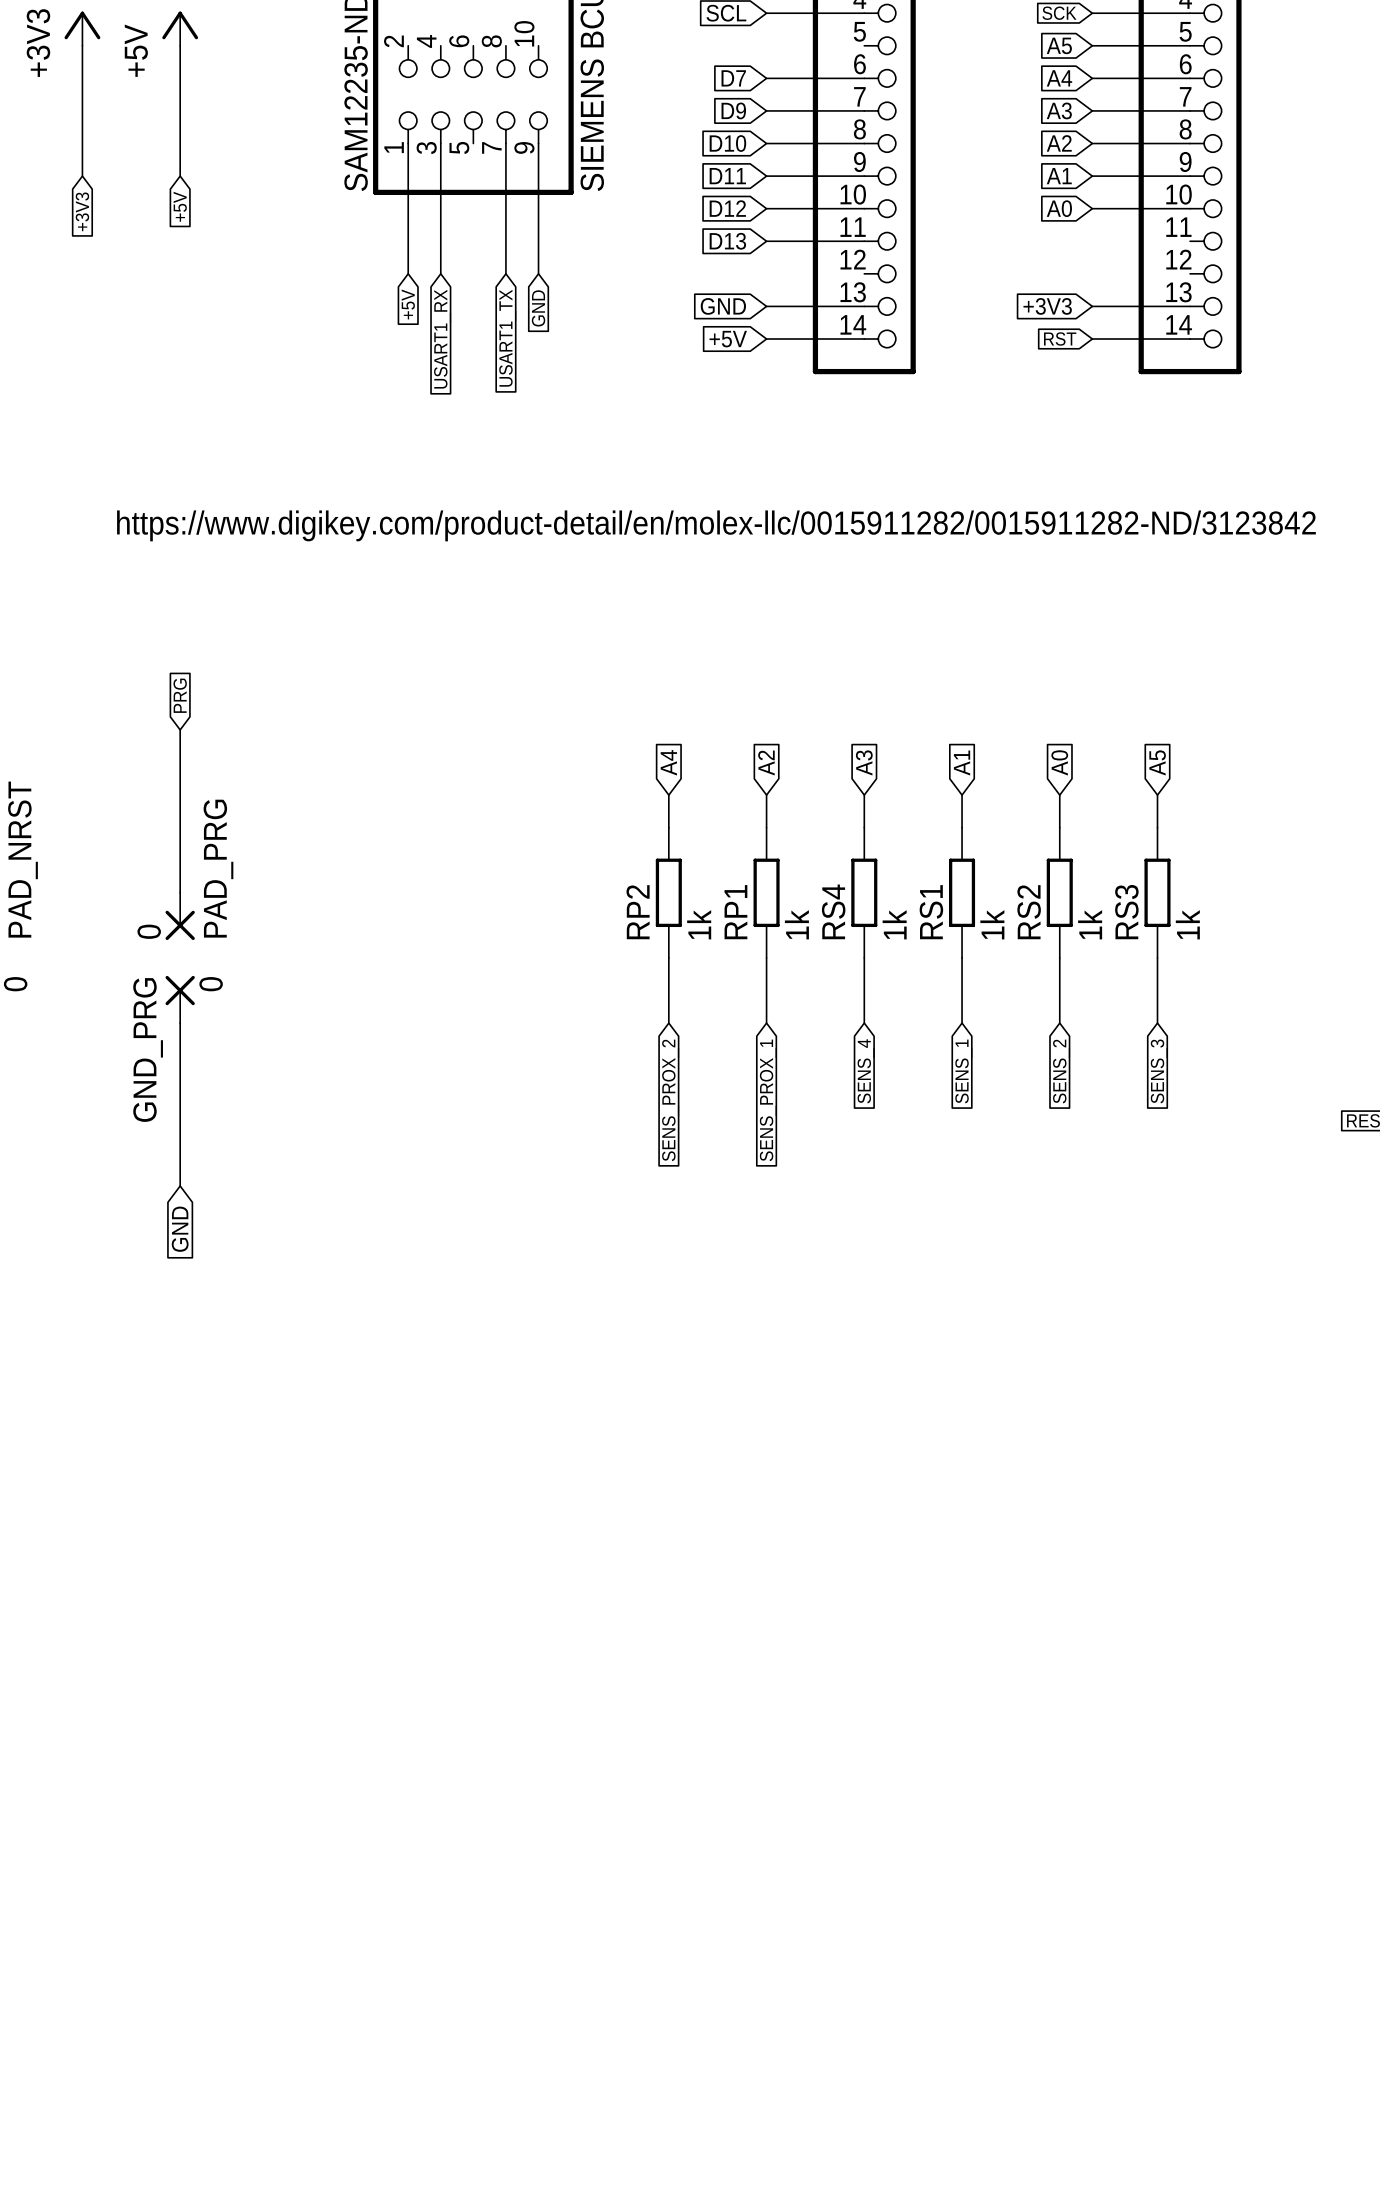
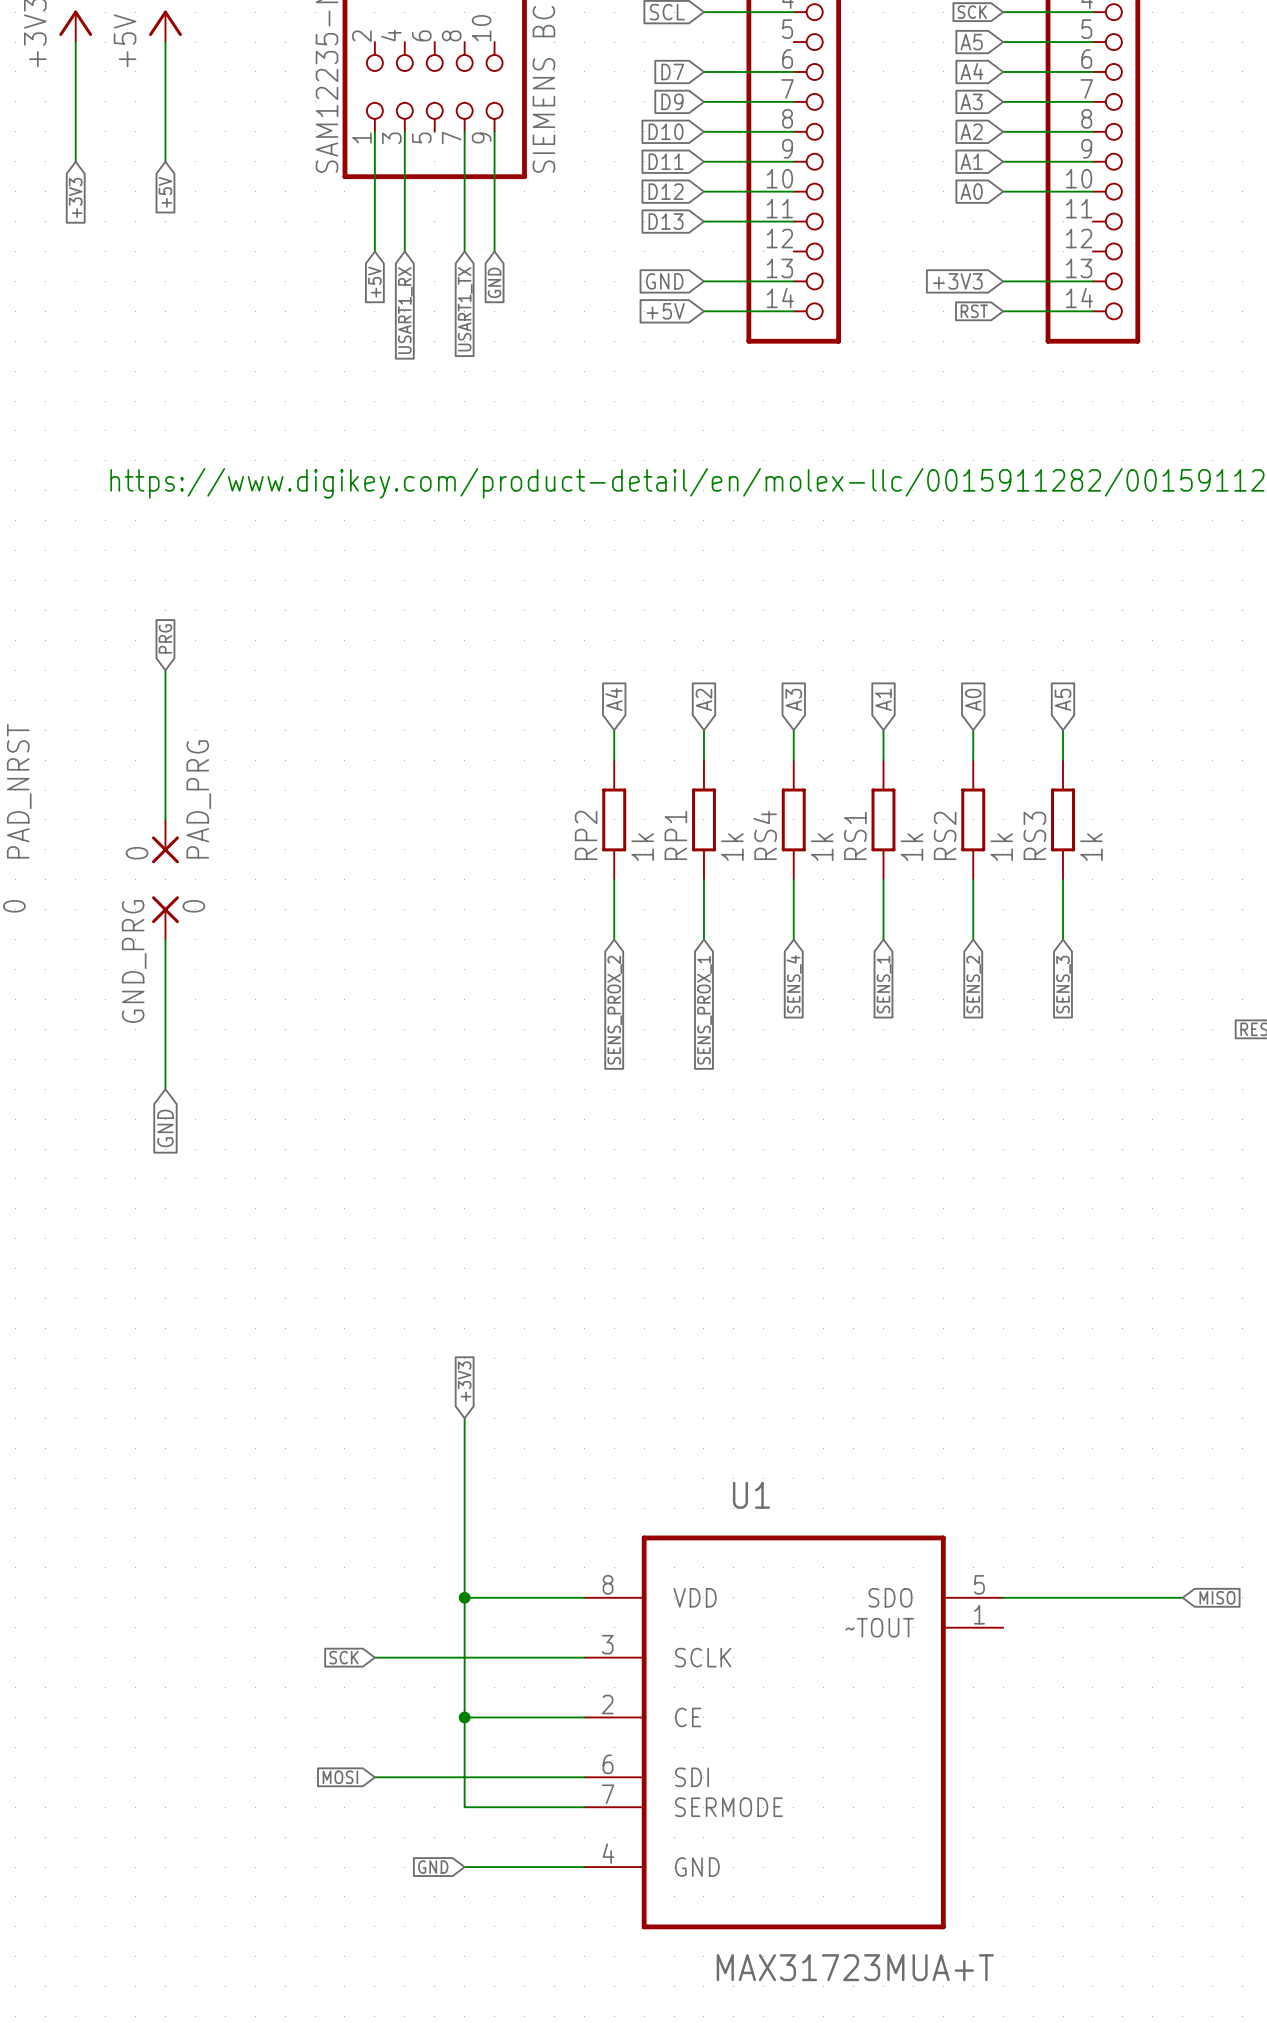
global label: none -> +3V3 (464, 1381)
wire: none -> (464, 1418) (464, 1807) (584, 1807)
wire: none -> (464, 1597) (584, 1597)
junction: none -> (464, 1597)
wire: none -> (1003, 1597) (1182, 1597)
global label: none -> MISO (1217, 1597)
global label: none -> SCK (344, 1657)
wire: none -> (374, 1657) (584, 1657)
wire: none -> (464, 1717) (584, 1717)
junction: none -> (464, 1717)
U1: none -> MAX31723MUA+T (793, 1732)
global label: none -> MOSI (340, 1777)
wire: none -> (374, 1777) (584, 1777)
global label: none -> GND (433, 1867)
wire: none -> (464, 1867) (584, 1867)

